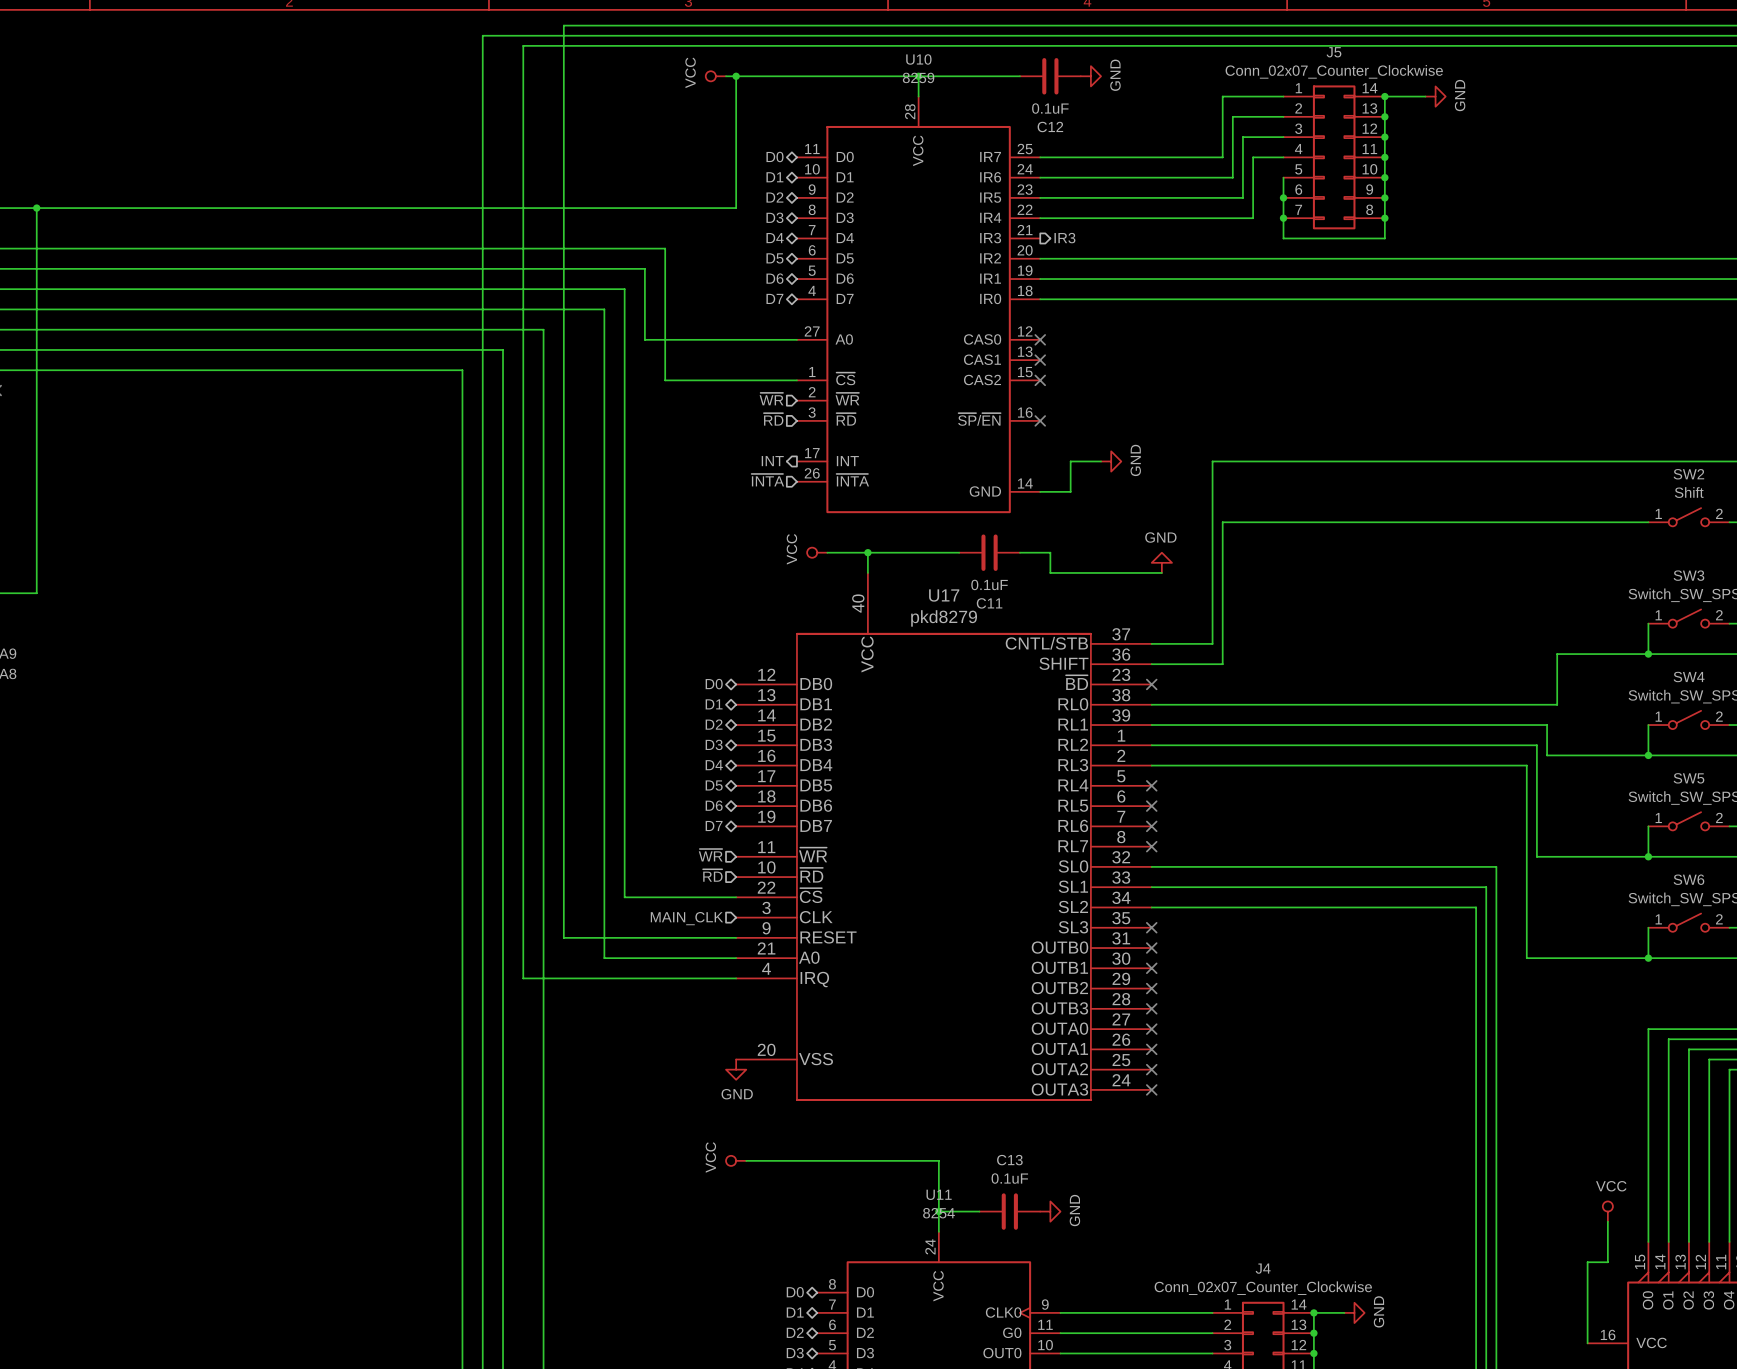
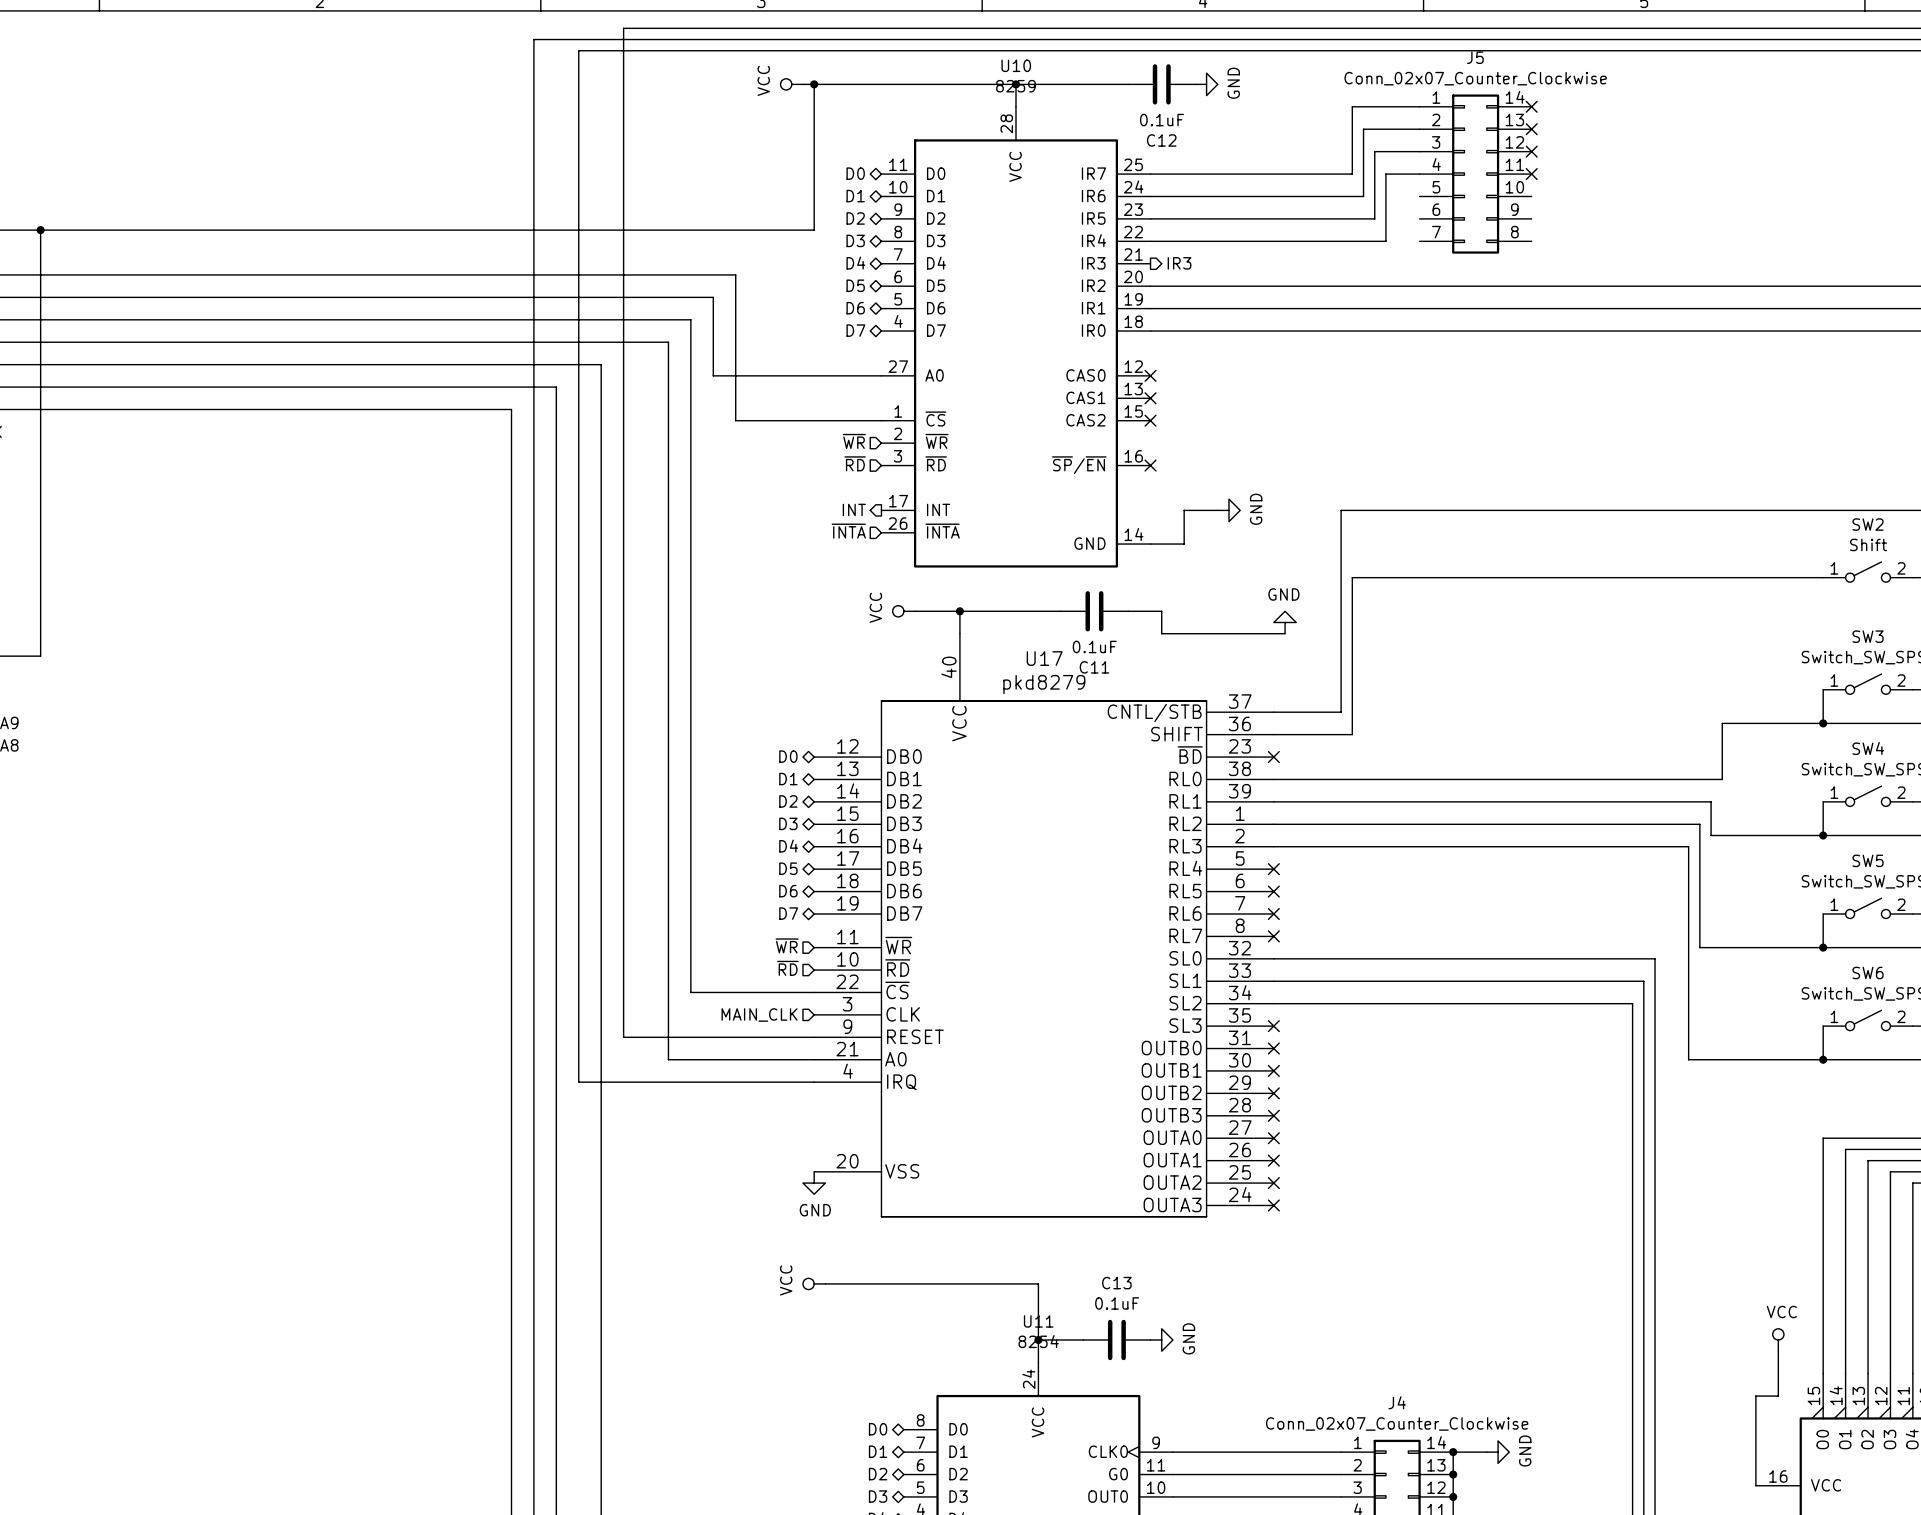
junction: (1384, 96) -> none
no-connect mark: none -> (1531, 106)
wire: (1425, 96) (1384, 96) (1384, 238) (1283, 238) (1283, 177) -> none
power symbol: GND (1435, 96) -> none
junction: (1384, 116) -> none
no-connect mark: none -> (1531, 129)
junction: (1384, 137) -> none
no-connect mark: none -> (1531, 151)
junction: (1384, 157) -> none
no-connect mark: none -> (1531, 174)
junction: (1384, 177) -> none
junction: (1283, 197) -> none
junction: (1384, 197) -> none
junction: (1283, 218) -> none
junction: (1384, 218) -> none

